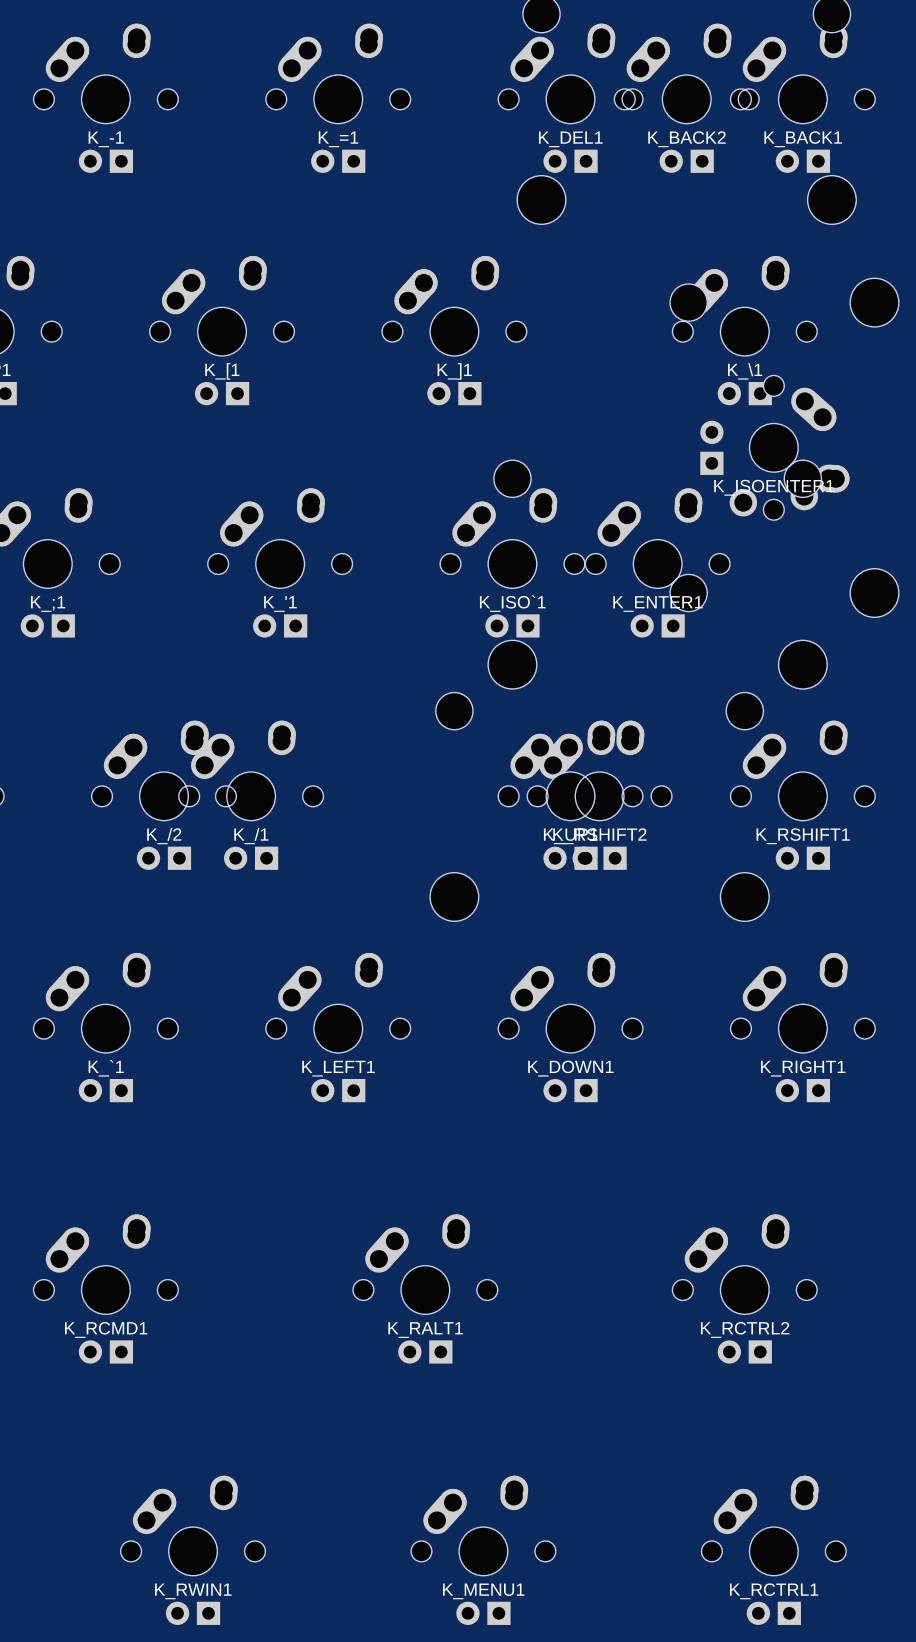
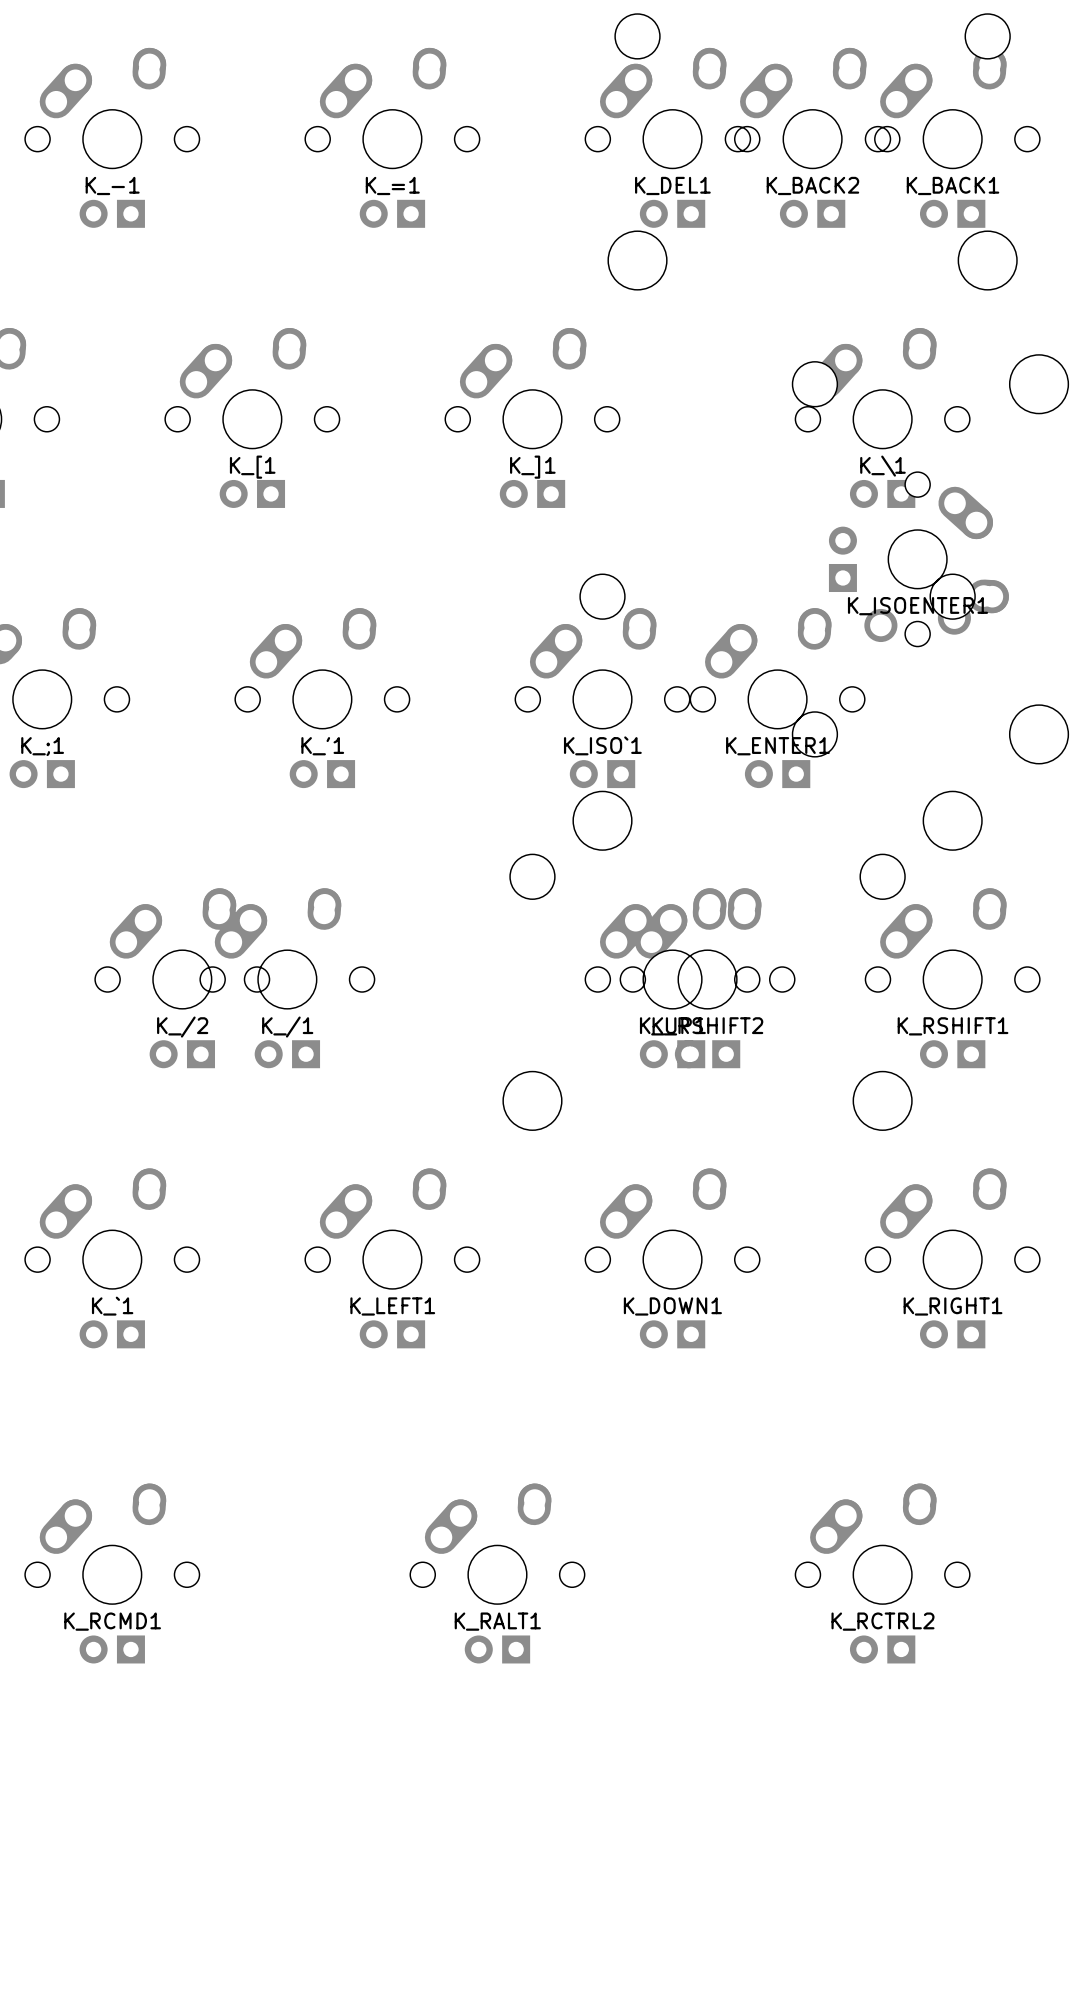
K_RWIN1: (193, 1550) -> none
K_MENU1: (483, 1550) -> none
K_RCTRL1: (773, 1550) -> none

